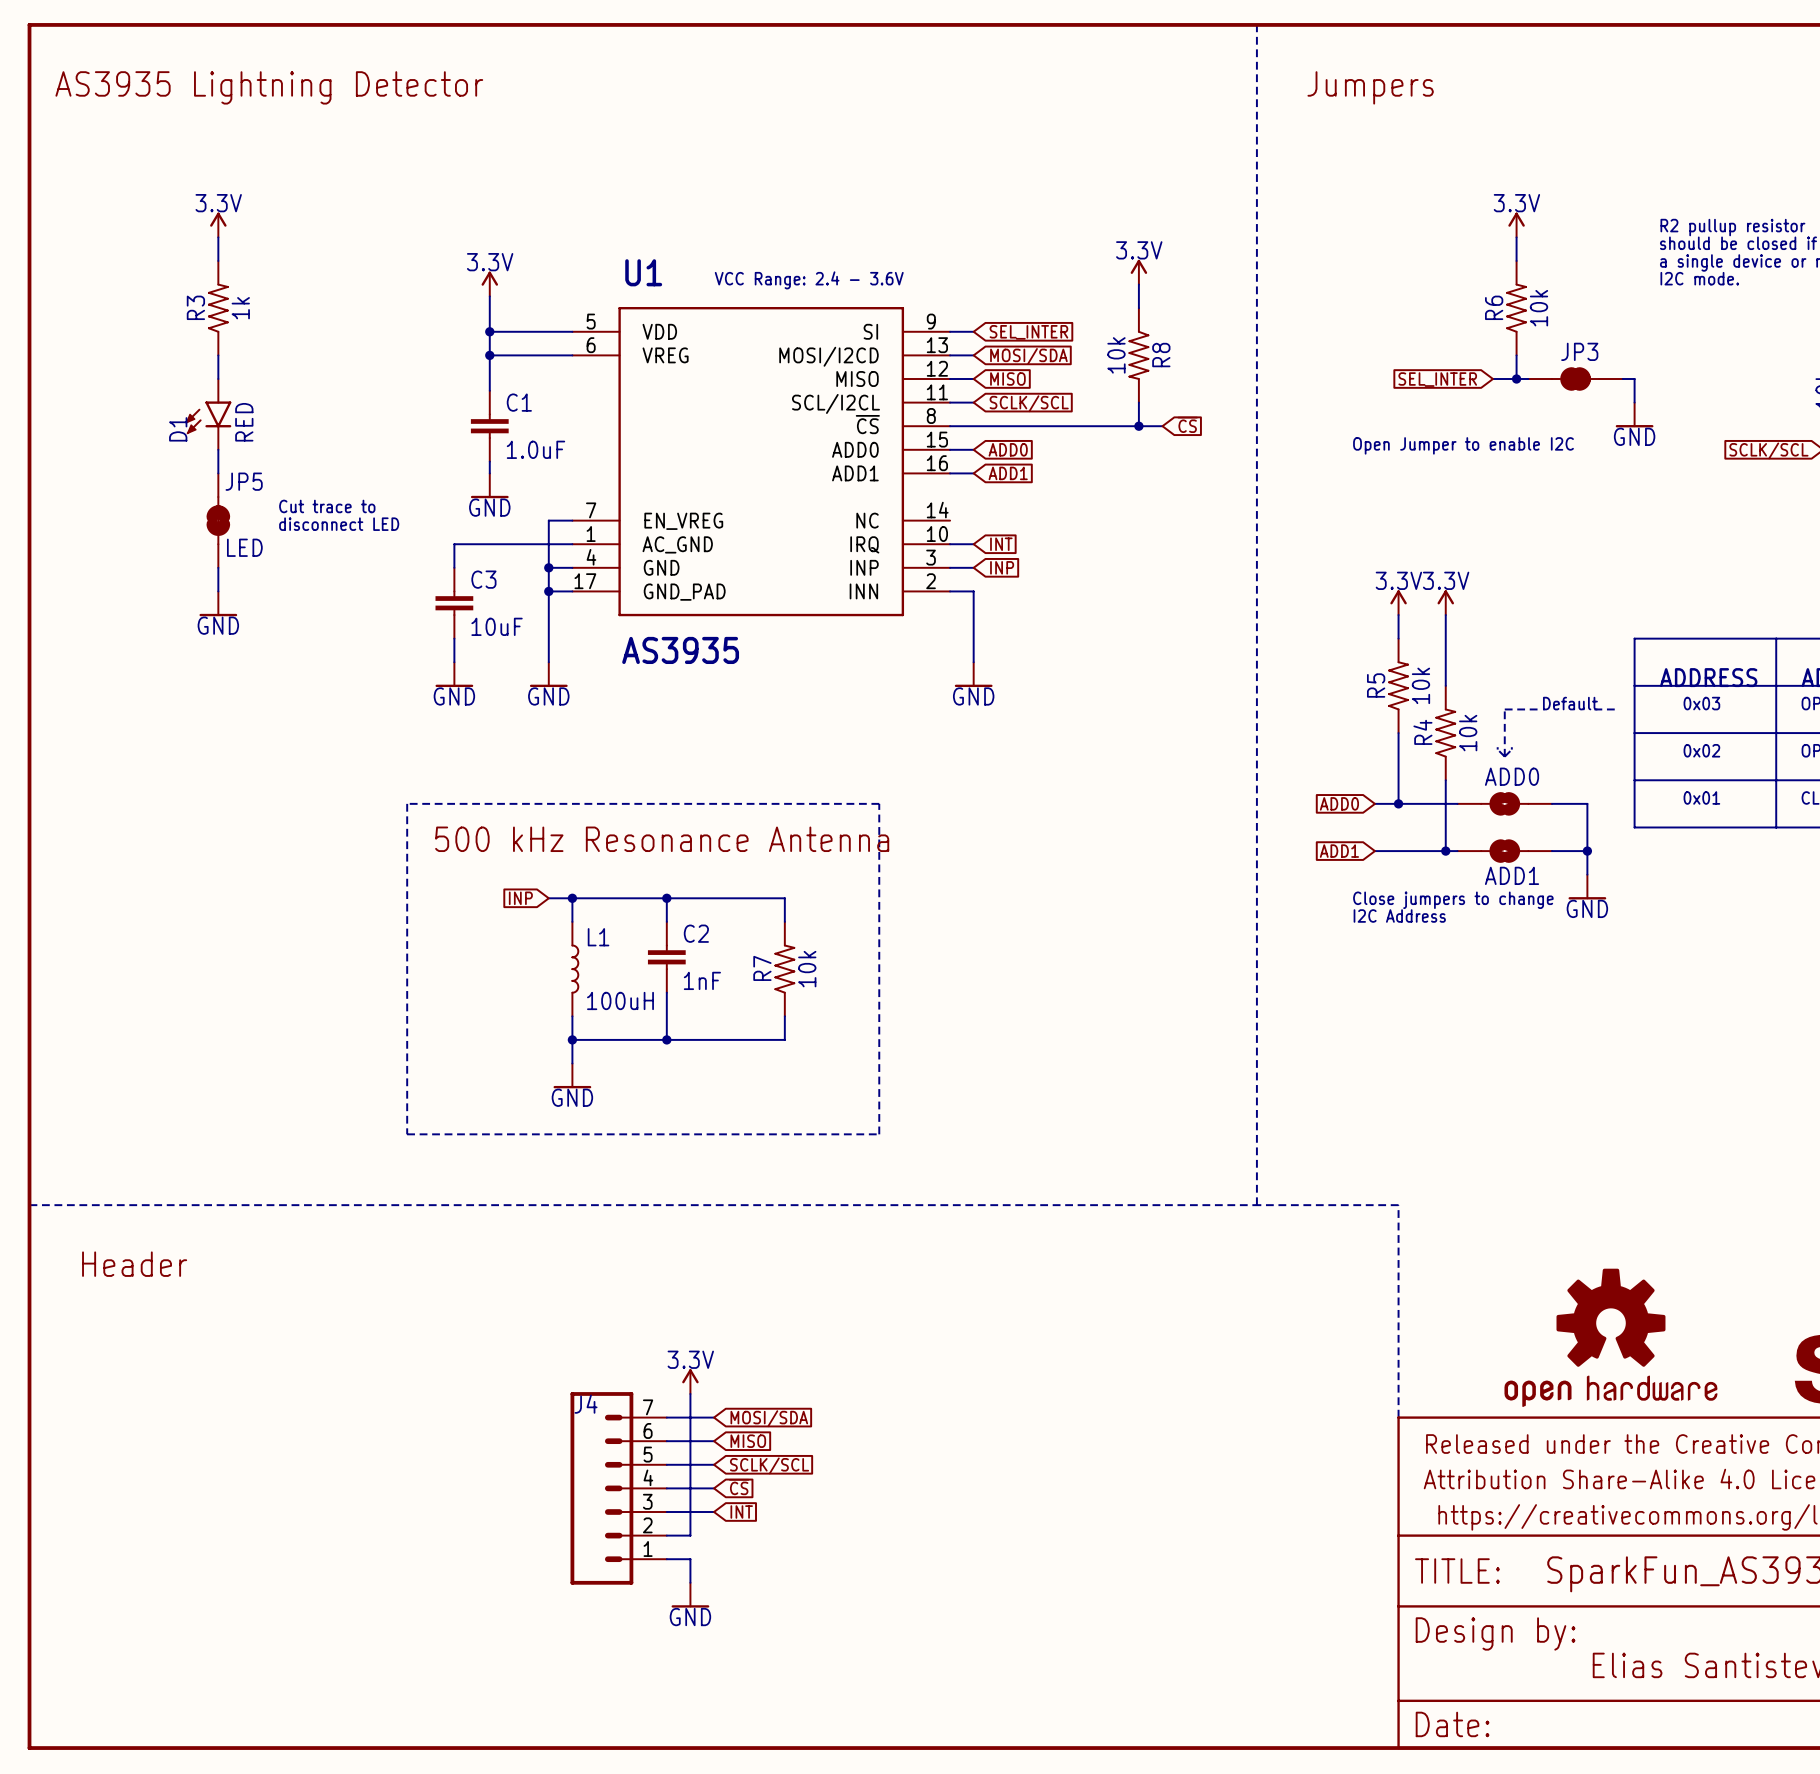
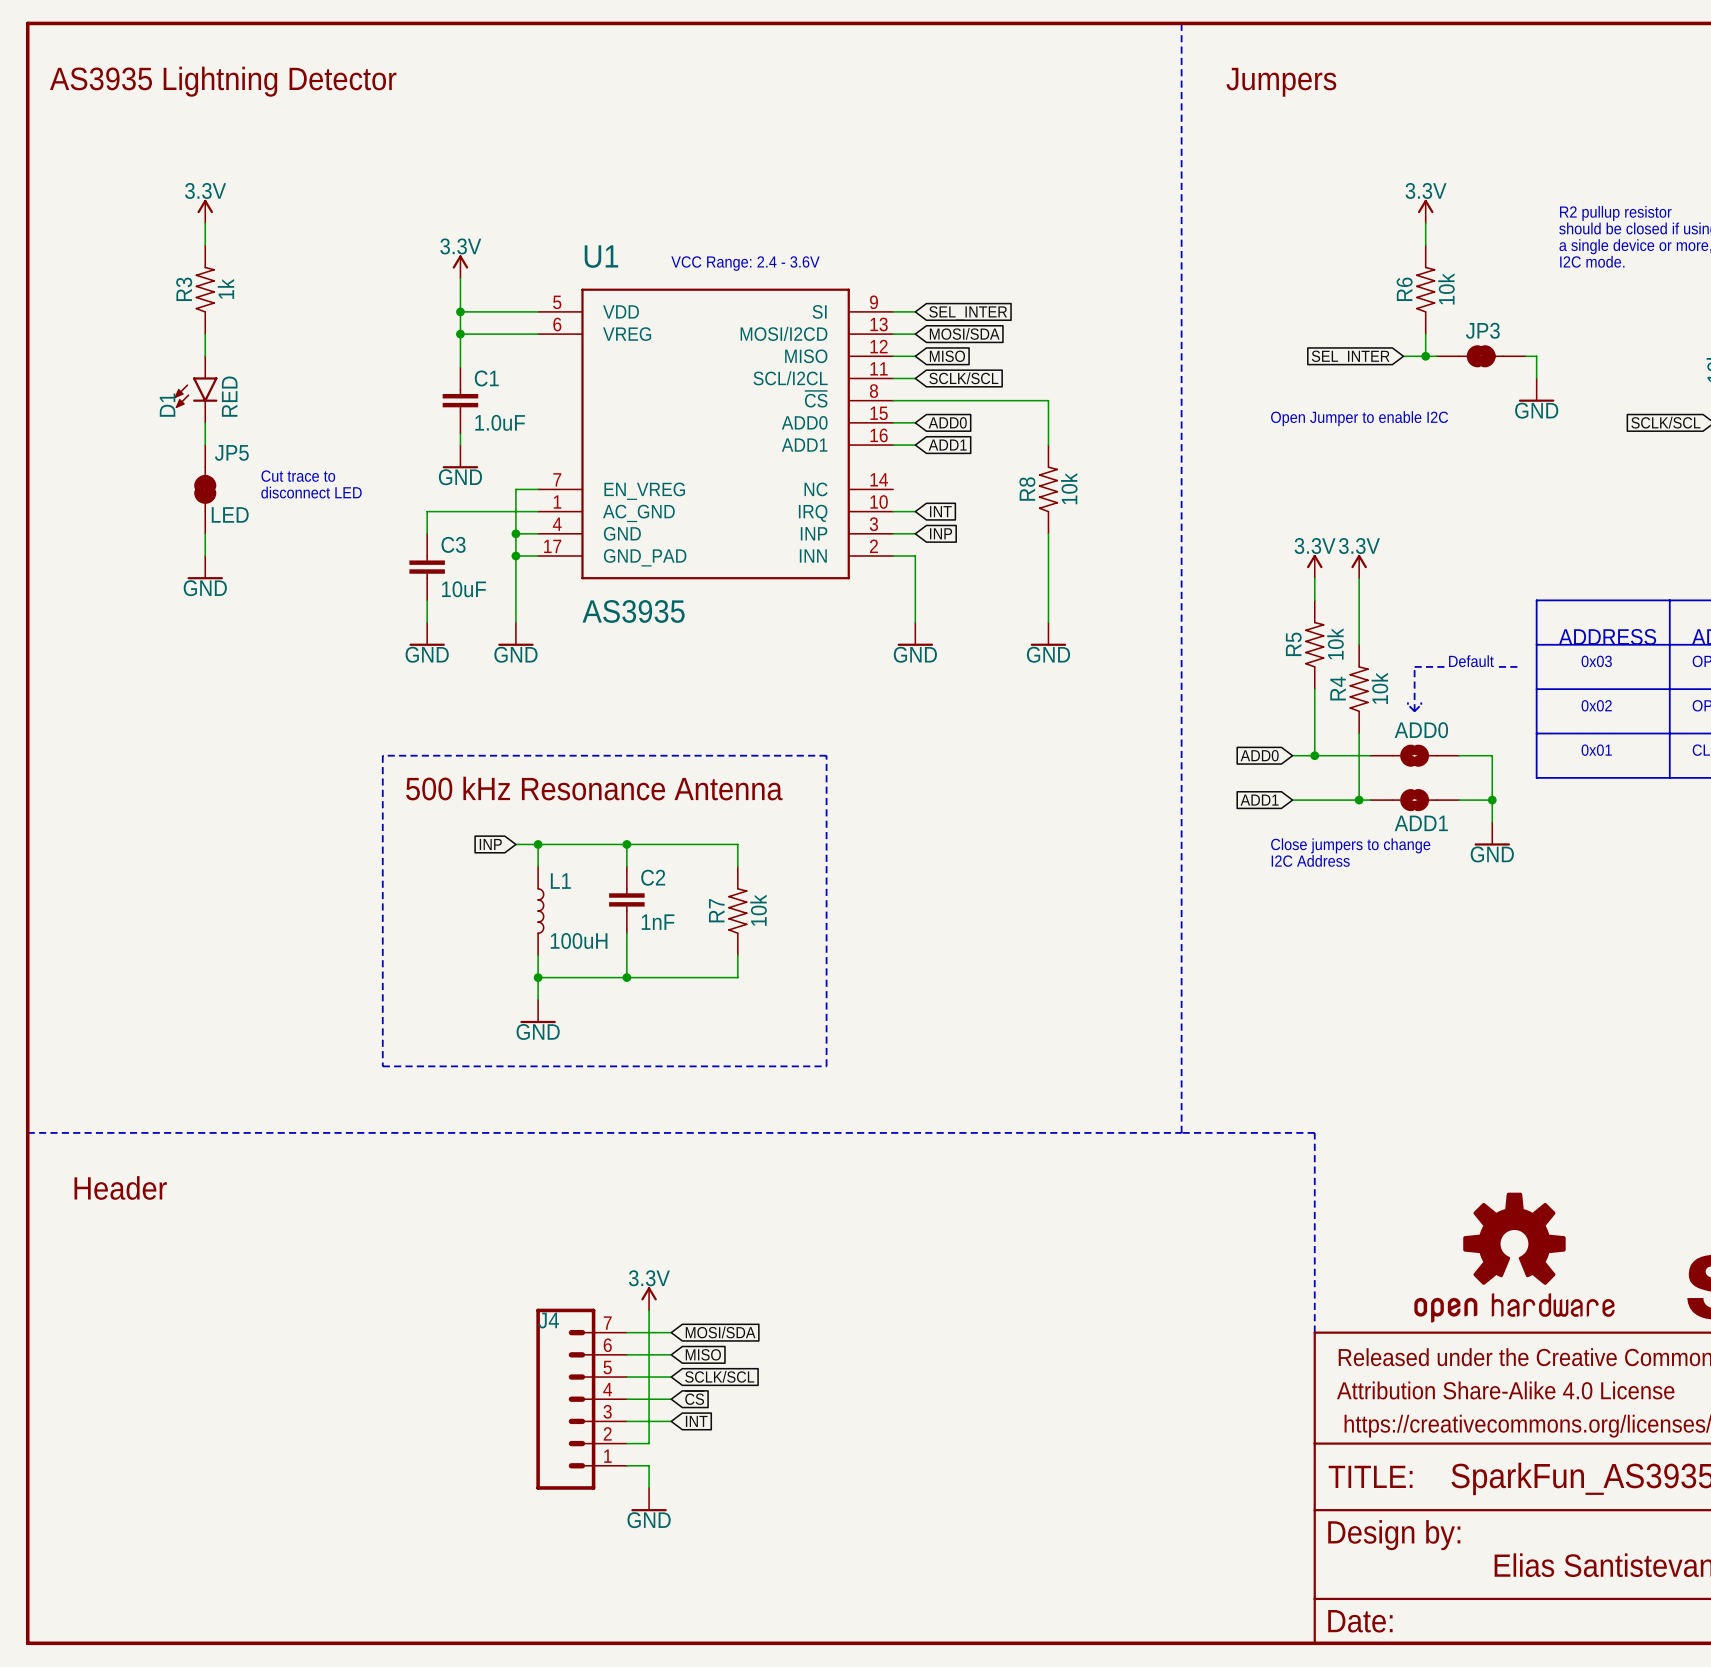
power symbol: 3.3V (1138, 272) -> none
wire: (1138, 284) (1138, 308) -> none
R8 rotation: 0° (1138, 355) -> 180° (1048, 489)
R8 position: (1138, 355) -> (1048, 489)
wire: (1138, 402) (1138, 426) -> none
global label: ~{CS} (1187, 424) -> none
wire: (1115, 426) (1162, 426) -> (1048, 400) (1048, 445)
junction: (1138, 426) -> none
wire: none -> (1048, 533) (1048, 622)
power symbol: none -> GND (1048, 634)

